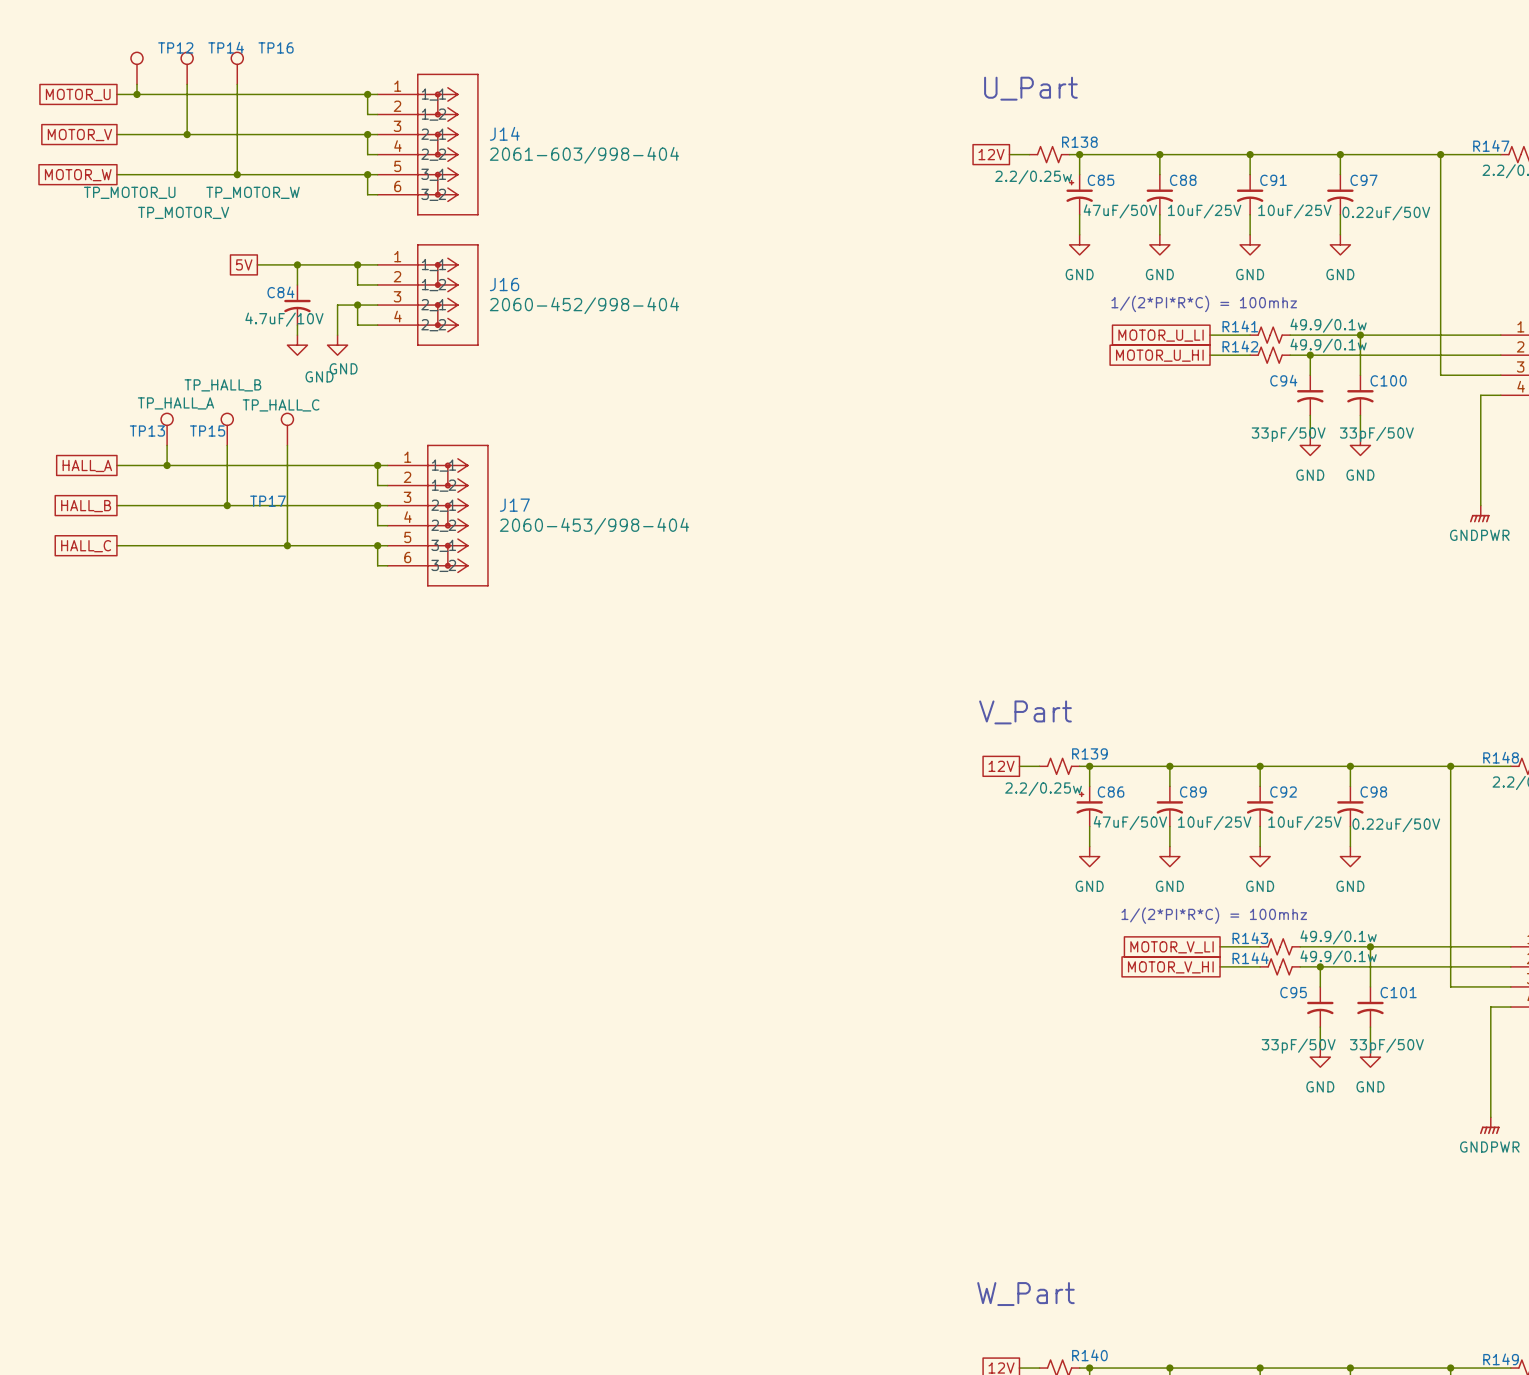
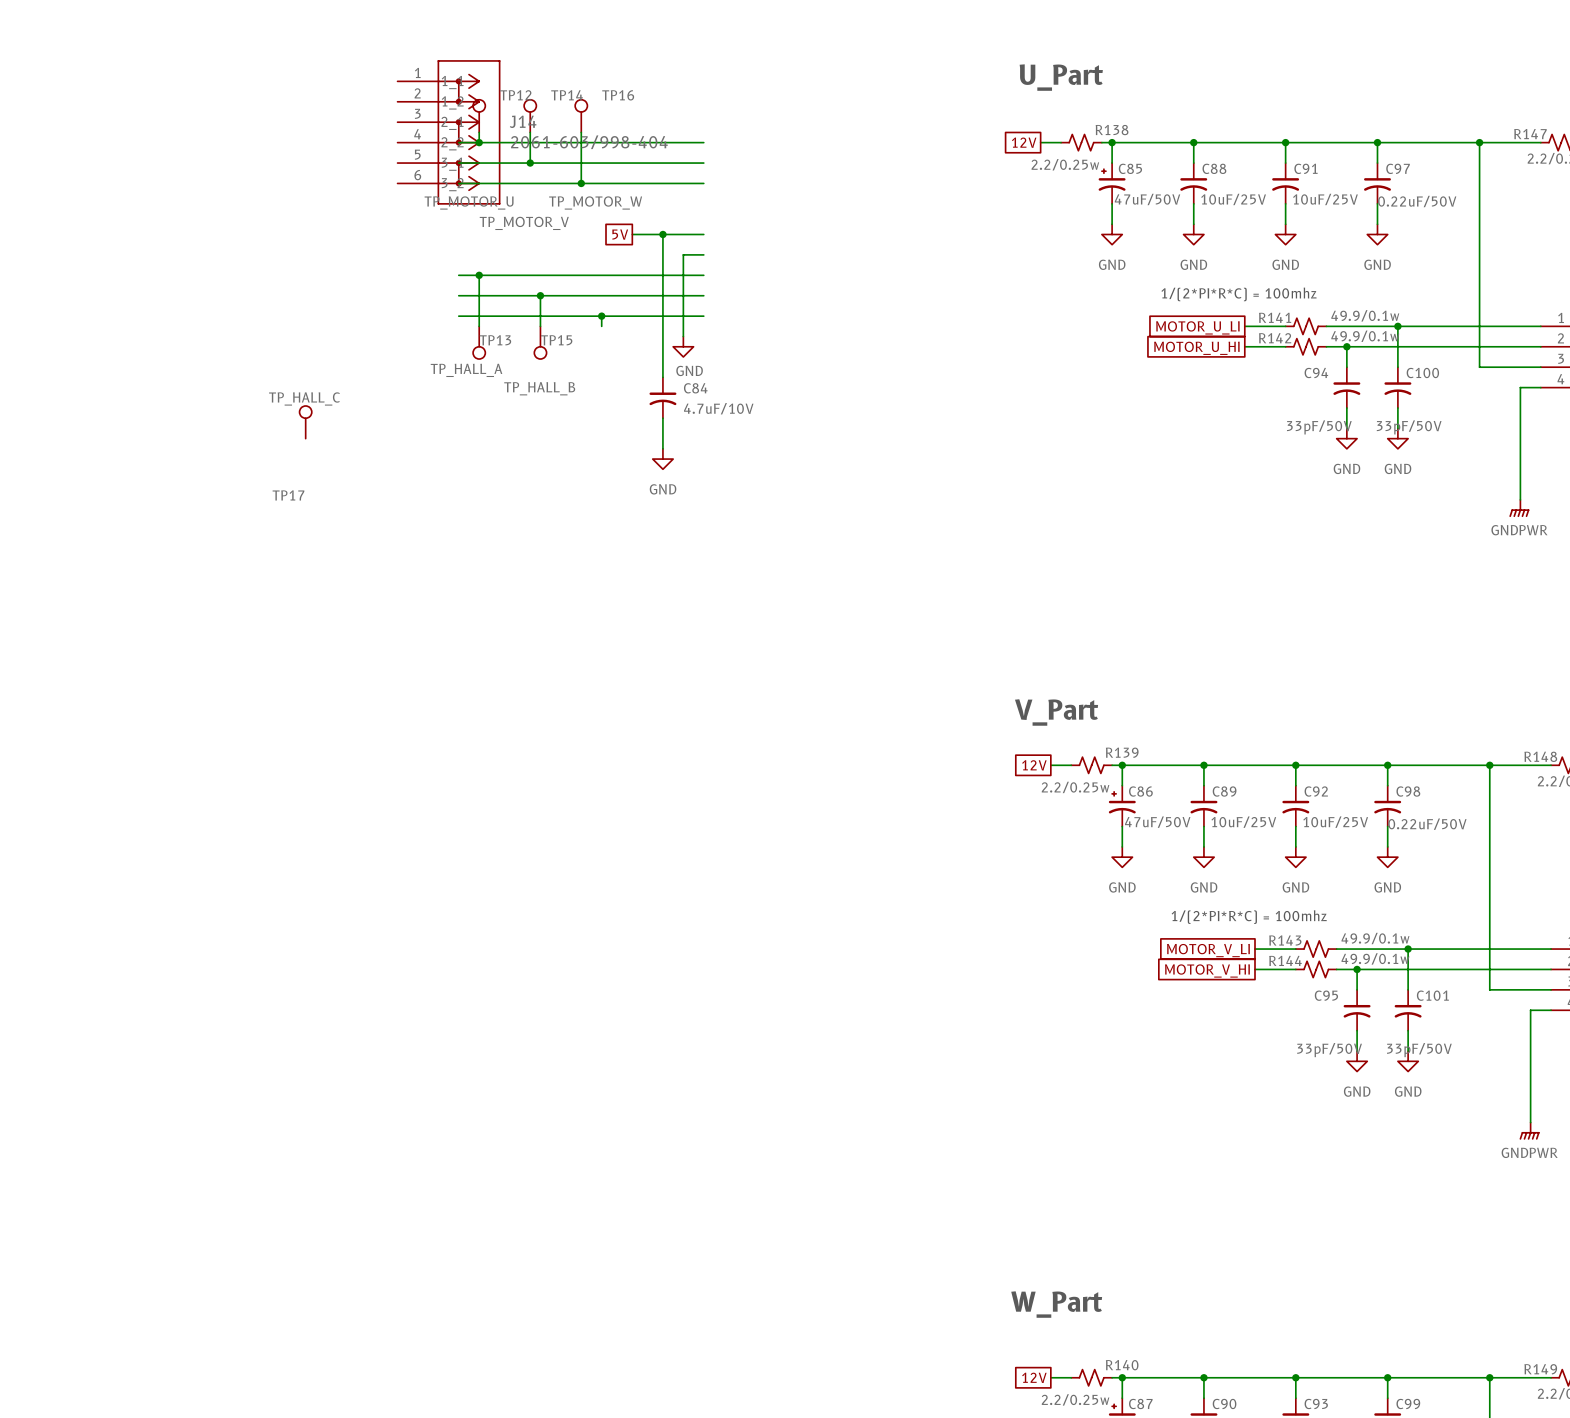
TP12 position: (137, 68) -> (479, 116)
TP14 position: (187, 68) -> (530, 116)
TP16 position: (237, 68) -> (581, 116)
wire: (137, 84) (137, 94) -> none
wire: (187, 84) (187, 134) -> none
wire: (237, 84) (237, 174) -> none
global label: MOTOR_U (78, 94) -> none
wire: (116, 94) (377, 94) -> none
junction: (137, 94) -> none
wire: (367, 94) (367, 114) (377, 114) -> none
junction: (367, 94) -> none
wire: (116, 134) (377, 134) -> none
junction: (187, 134) -> none
wire: (367, 134) (367, 154) (377, 154) -> none
junction: (367, 134) -> none
global label: MOTOR_V (79, 135) -> none
wire: none -> (479, 132) (479, 142)
wire: none -> (530, 132) (530, 163)
wire: none -> (581, 132) (581, 183)
wire: none -> (458, 142) (703, 142)
junction: none -> (479, 142)
wire: (116, 174) (377, 174) -> none
junction: (237, 174) -> none
wire: (367, 174) (367, 194) (377, 194) -> none
junction: (367, 174) -> none
wire: none -> (458, 163) (703, 163)
junction: none -> (530, 163)
global label: MOTOR_W (78, 175) -> none
TP12 value position: TP_MOTOR_U (129, 192) -> TP_MOTOR_U (469, 202)
TP16 value position: TP_MOTOR_W (253, 192) -> TP_MOTOR_W (595, 202)
wire: none -> (458, 183) (703, 183)
junction: none -> (581, 183)
TP14 value position: TP_MOTOR_V (183, 212) -> TP_MOTOR_V (524, 223)
global label: none -> 5V (620, 234)
wire: none -> (632, 234) (703, 234)
wire: none -> (662, 234) (662, 377)
junction: none -> (662, 234)
global label: 5V (244, 264) -> none
wire: (257, 264) (377, 264) -> none
wire: (297, 264) (297, 284) -> none
junction: (297, 264) -> none
wire: (357, 264) (357, 284) (377, 284) -> none
junction: (357, 264) -> none
wire: none -> (703, 254) (683, 254) (683, 336)
wire: none -> (458, 275) (703, 275)
wire: none -> (479, 275) (479, 326)
junction: none -> (479, 275)
C84 name position: C84 (280, 292) -> C84 (695, 388)
J16: 2060-452/998-404 (428, 295) -> none
C84 position: (297, 305) -> (662, 397)
wire: (357, 305) (357, 325) (377, 325) -> none
junction: (357, 305) -> none
wire: (377, 305) (337, 305) (337, 335) -> none
wire: none -> (458, 295) (703, 295)
wire: none -> (540, 295) (540, 326)
junction: none -> (540, 295)
C84 value position: 4.7uF/10V (284, 319) -> 4.7uF/10V (718, 408)
wire: (297, 325) (297, 335) -> none
wire: none -> (458, 316) (703, 316)
wire: none -> (601, 316) (601, 326)
junction: none -> (601, 316)
power symbol: GND (297, 345) -> none
power symbol: GND (337, 345) -> none
power symbol: none -> GND (683, 346)
TP13 rotation: 0° (167, 419) -> 180° (479, 352)
TP15 rotation: 0° (227, 419) -> 180° (540, 352)
wire: none -> (662, 418) (662, 448)
TP13 position: (167, 429) -> (479, 342)
TP15 position: (227, 429) -> (540, 342)
wire: (167, 445) (167, 465) -> none
wire: (227, 445) (227, 505) -> none
wire: (287, 445) (287, 545) -> none
global label: HALL_A (87, 465) -> none
wire: (116, 465) (387, 465) -> none
junction: (167, 465) -> none
wire: (377, 465) (377, 485) (387, 485) -> none
junction: (377, 465) -> none
power symbol: none -> GND (662, 459)
wire: (116, 505) (387, 505) -> none
junction: (227, 505) -> none
wire: (377, 505) (377, 525) (387, 525) -> none
junction: (377, 505) -> none
global label: HALL_B (86, 506) -> none
J17: 2060-453/998-404 (438, 515) -> none
wire: (116, 545) (387, 545) -> none
junction: (287, 545) -> none
wire: (377, 545) (377, 565) (387, 565) -> none
junction: (377, 545) -> none
global label: HALL_C (86, 546) -> none

